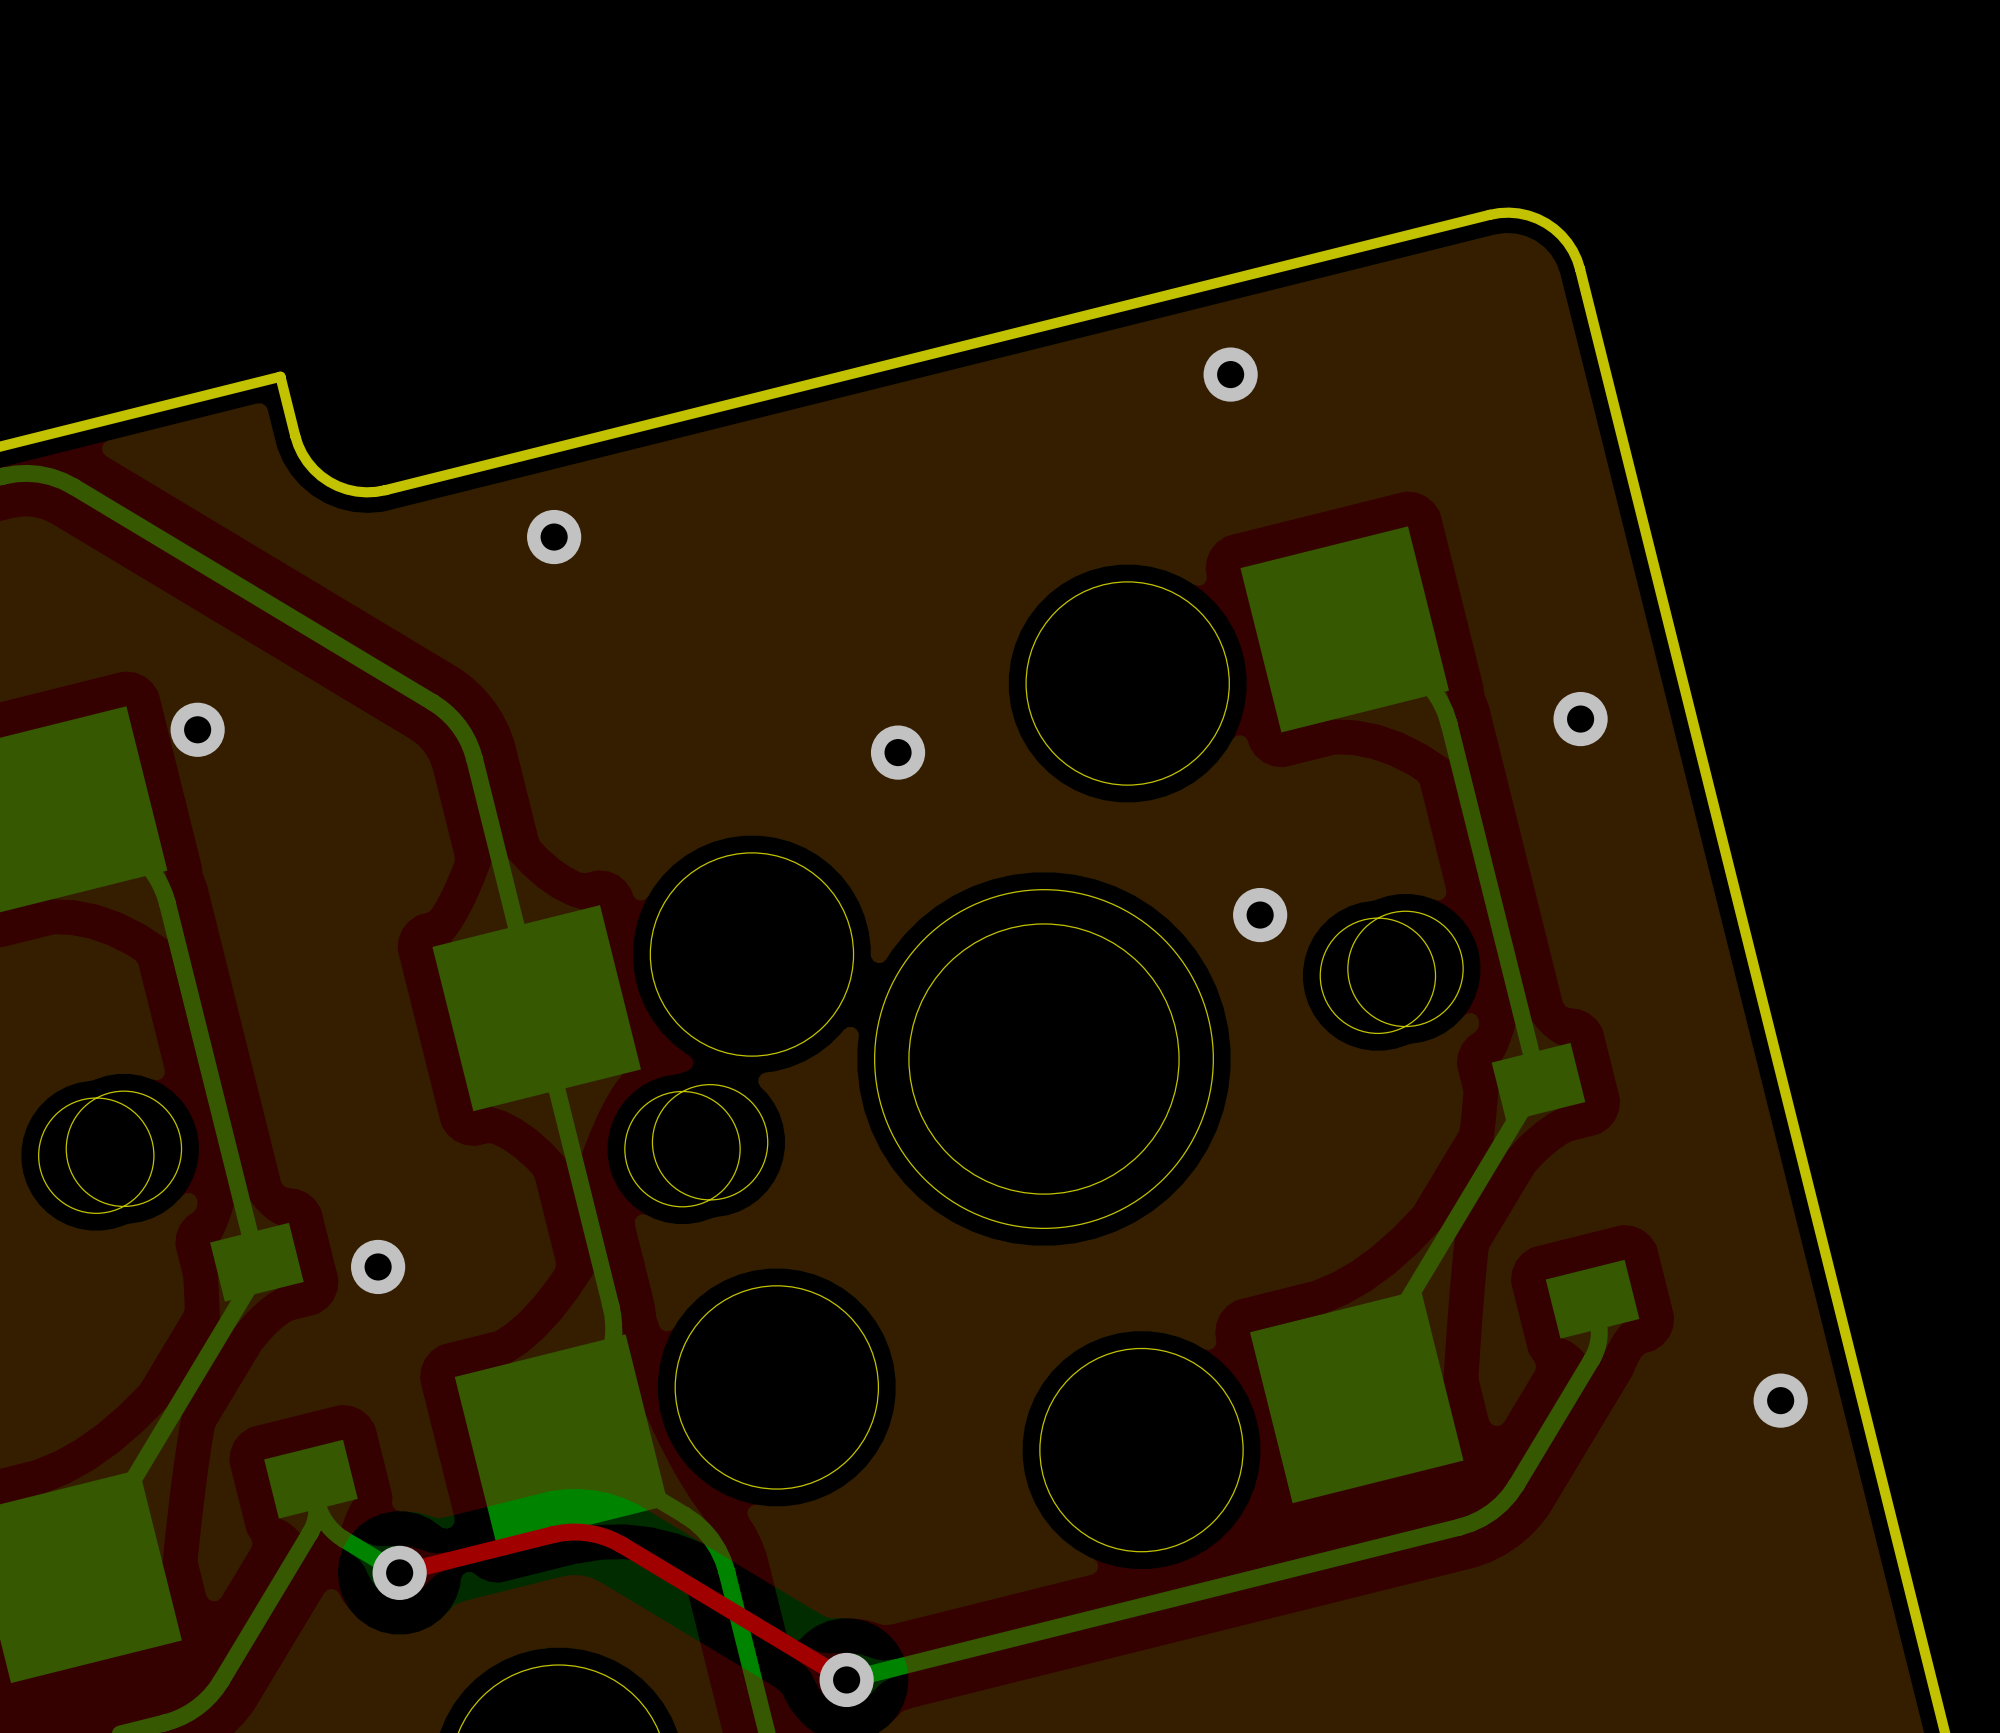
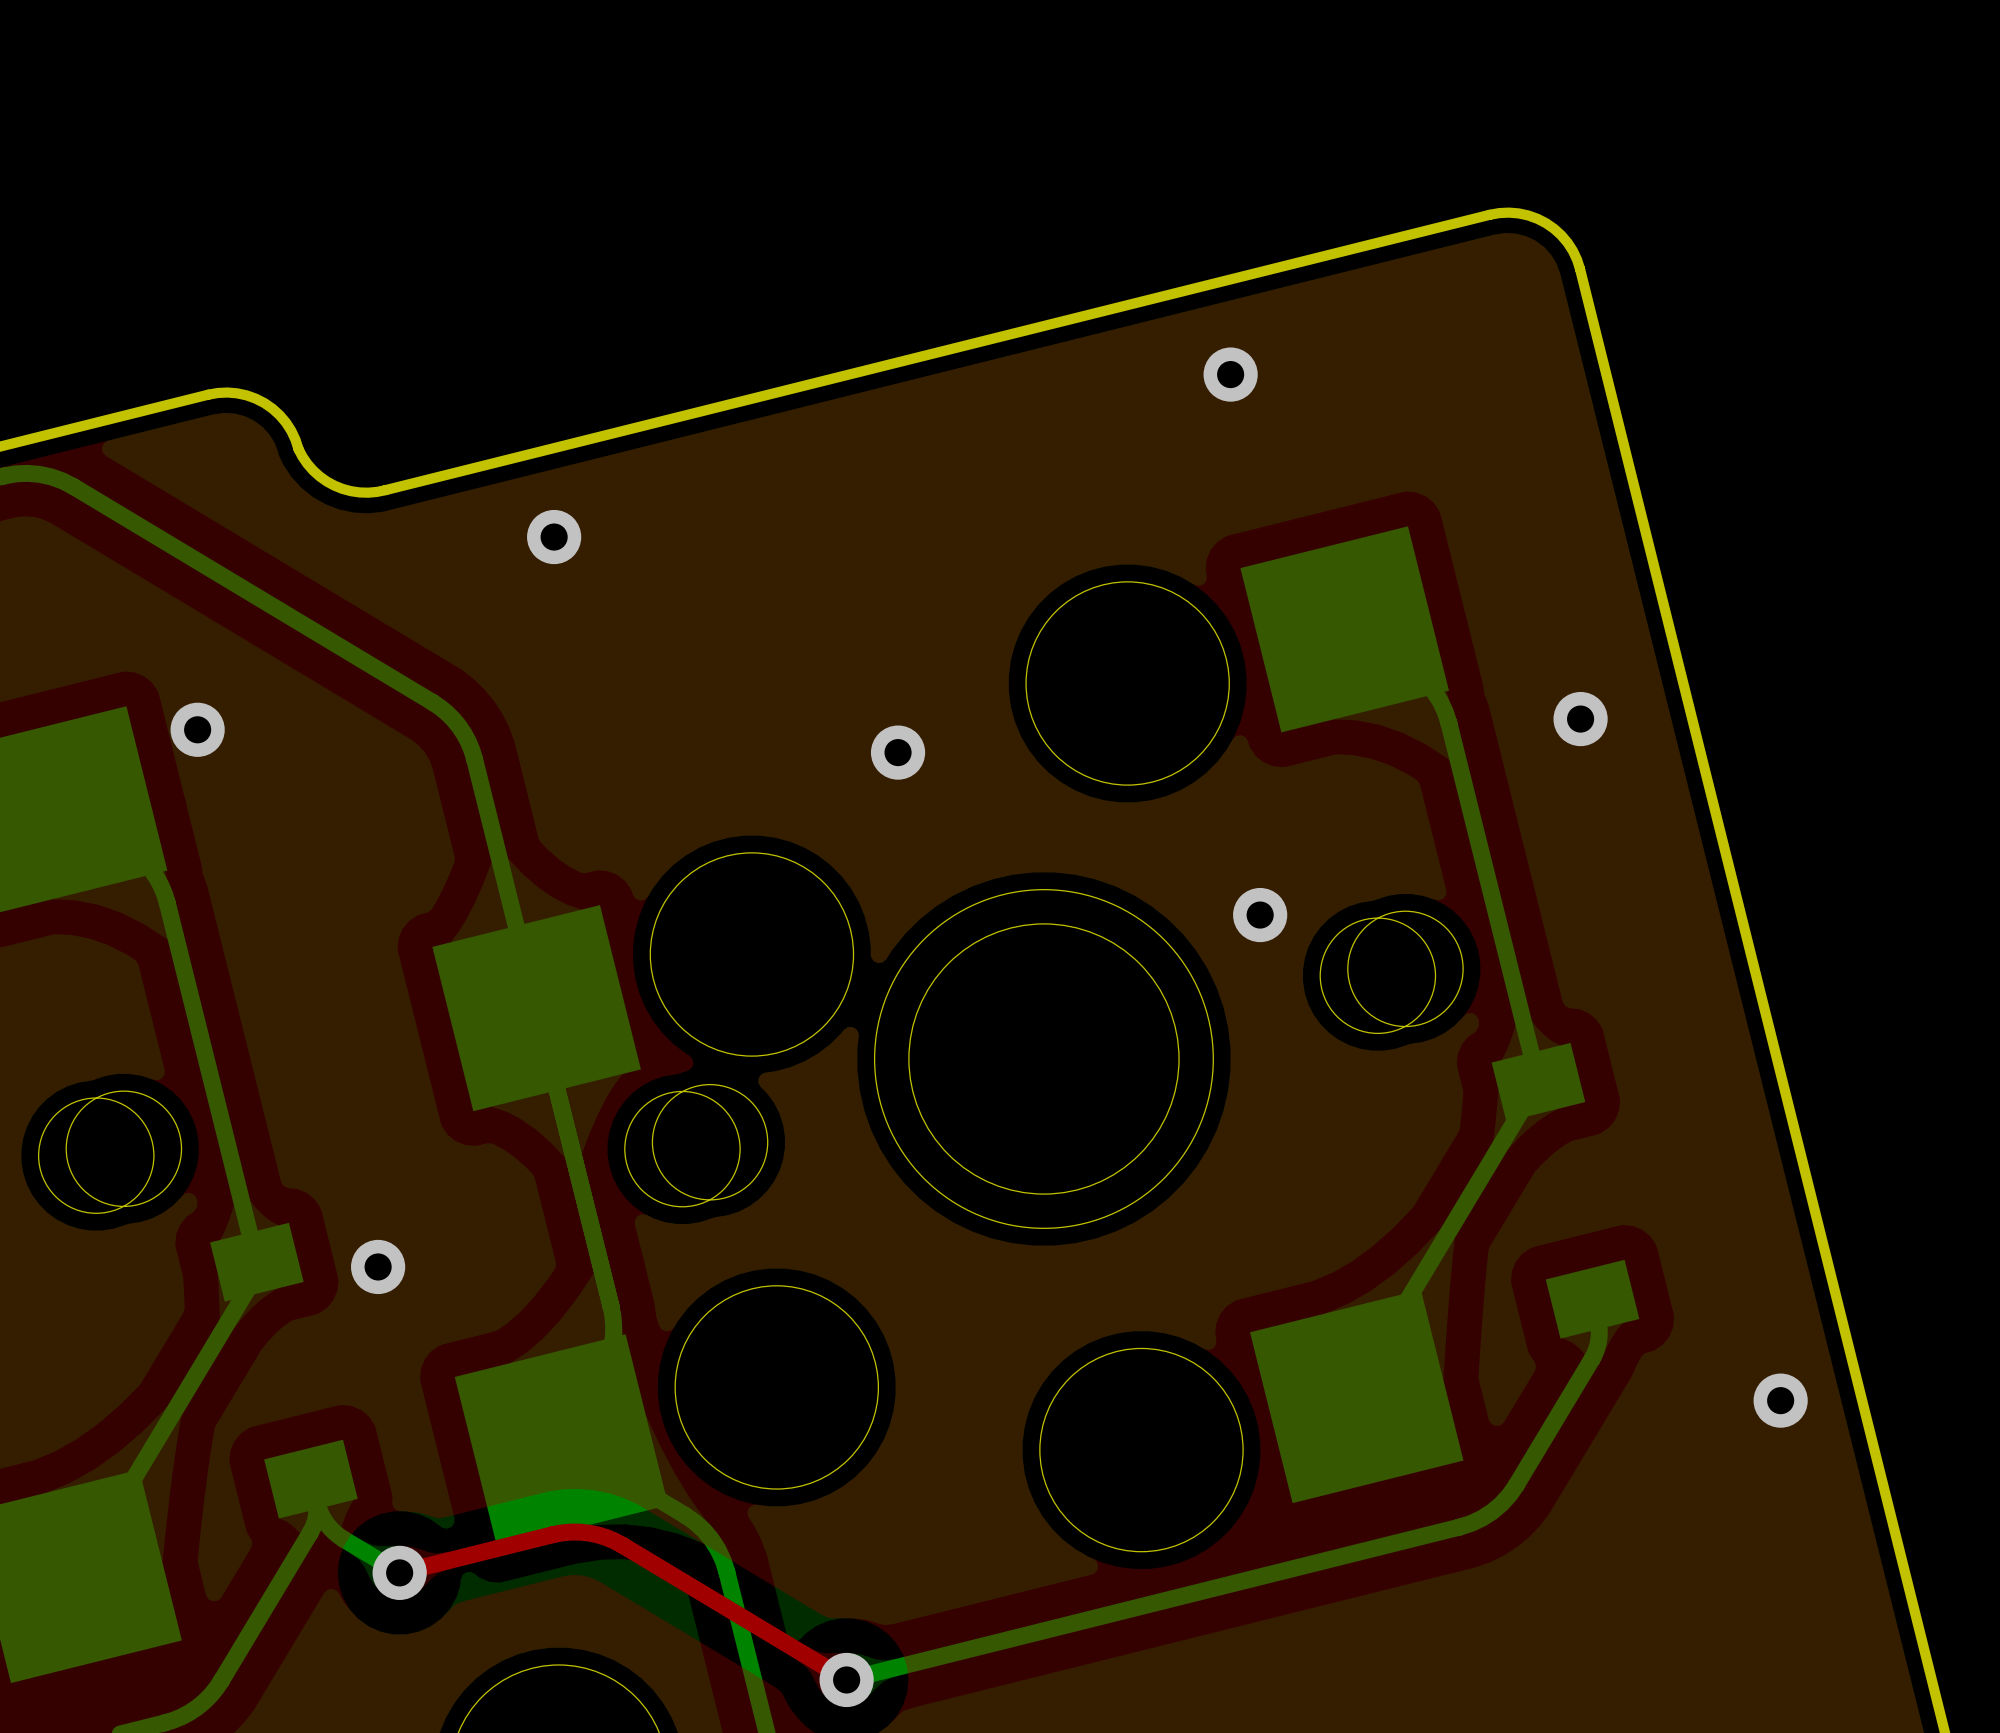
board edge: (208, 394) (280, 376) (298, 445) (313, 469) (329, 481) (346, 489) (366, 492) (385, 490) -> (208, 394) (227, 392) (246, 395) (272, 408) (291, 430) (298, 449) (307, 463) (319, 476) (334, 485) (359, 492) (385, 490)

